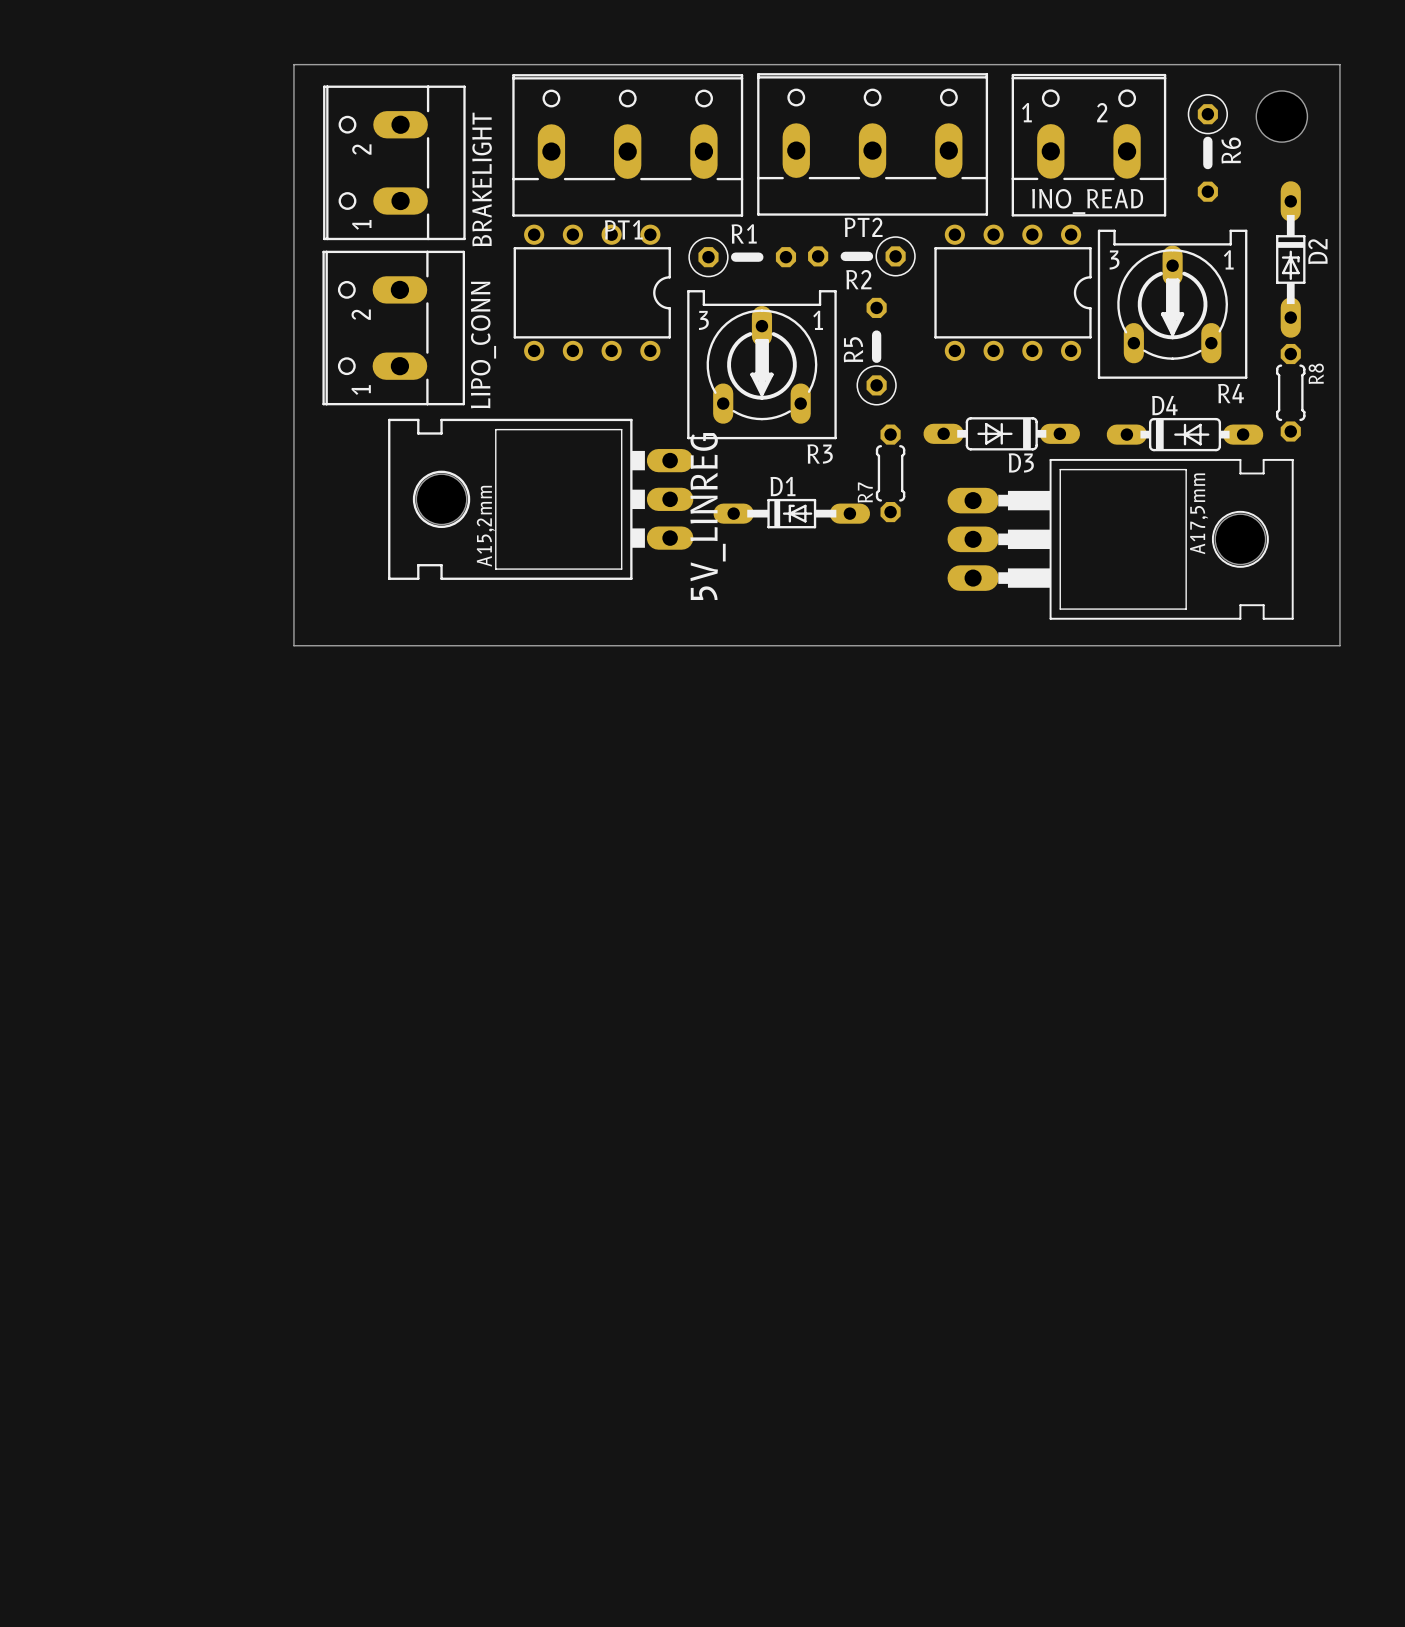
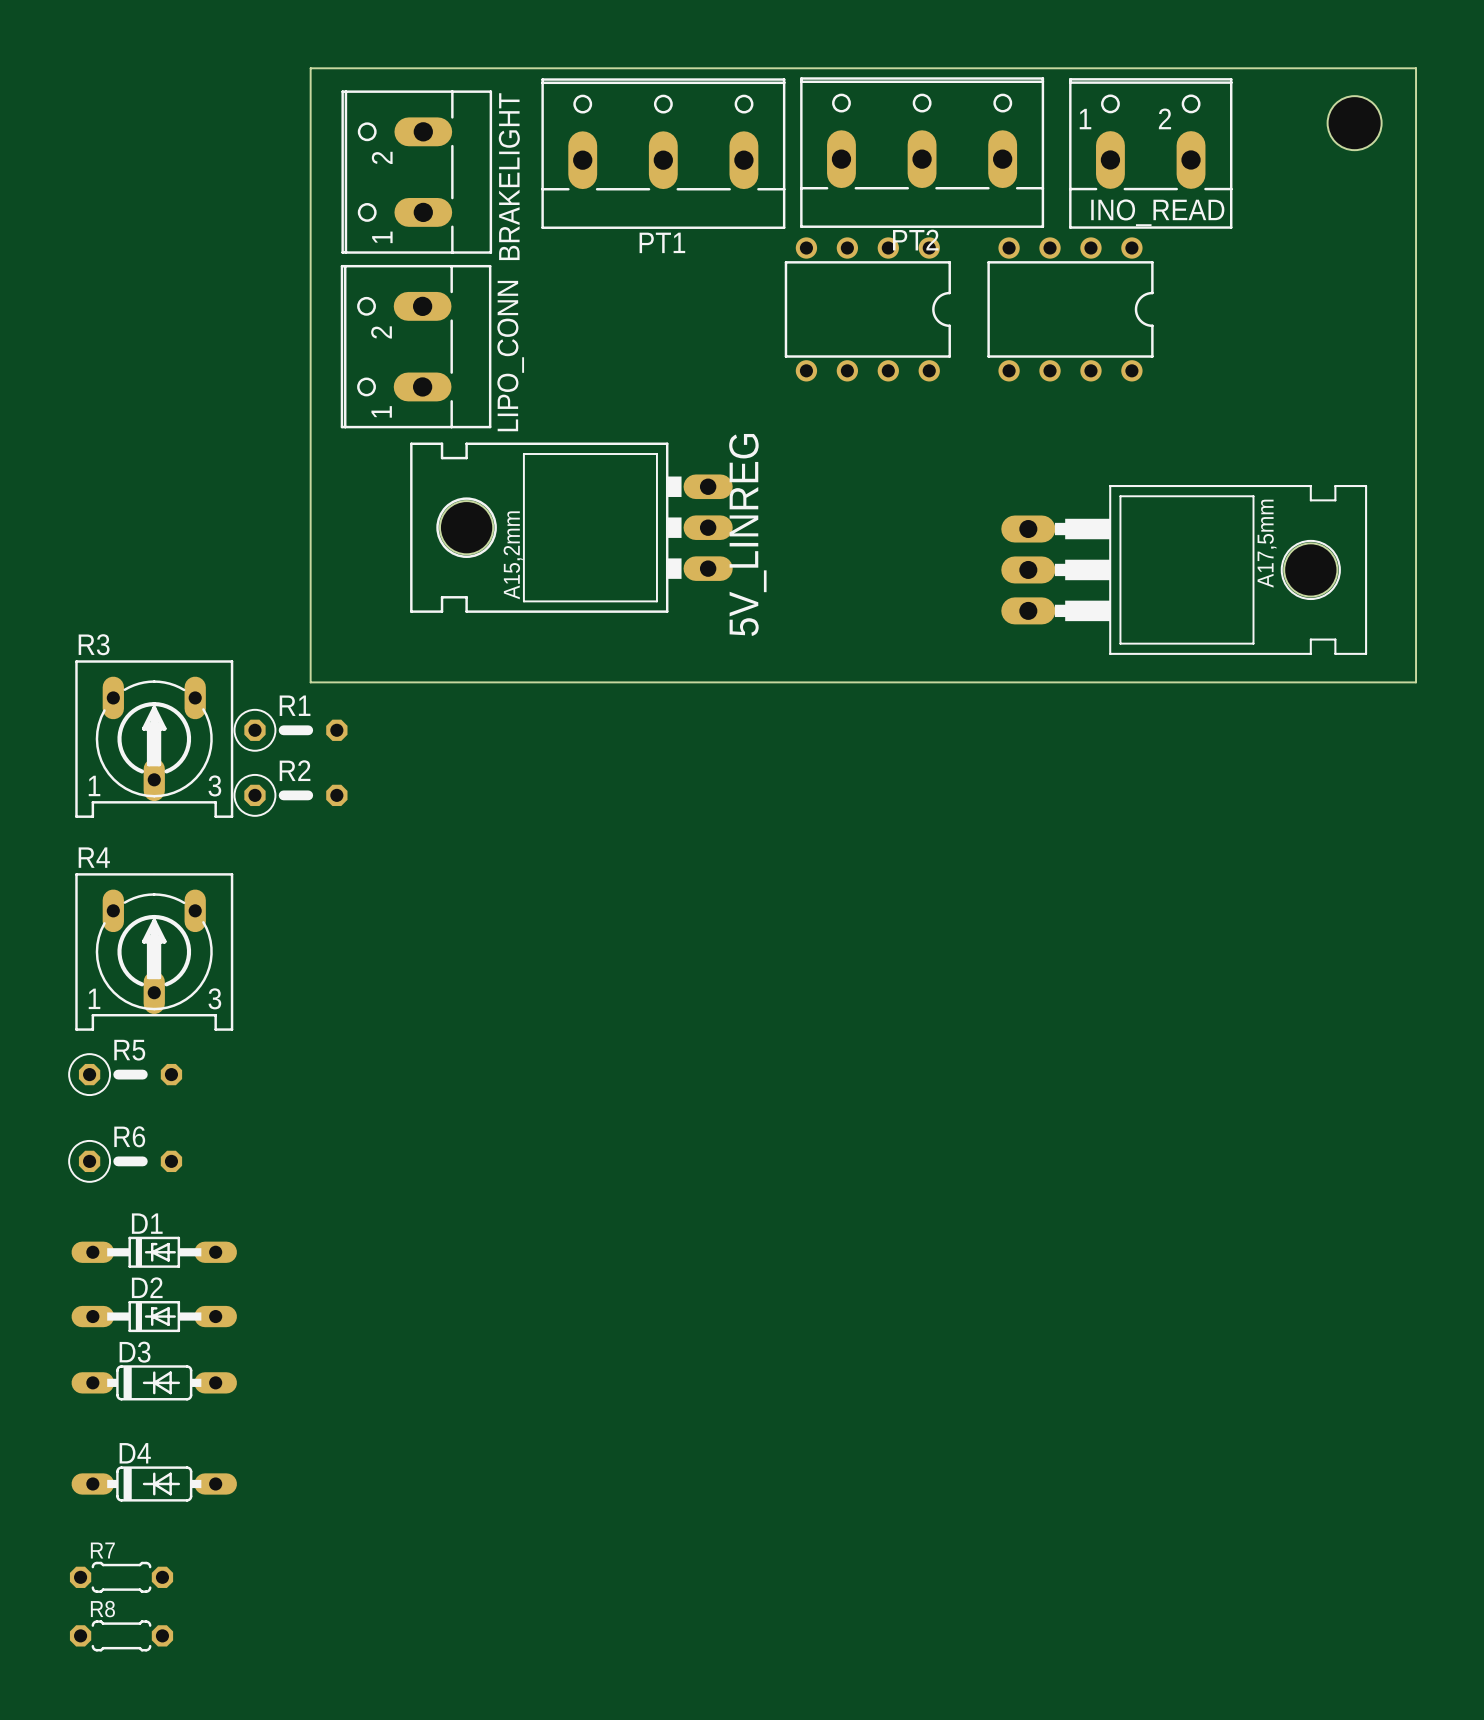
R6 rotation: 0° (1207, 147) -> 90° counterclockwise (125, 1161)
R6 position: (1207, 147) -> (125, 1161)
R4 footprint: [1097, 229, 1248, 379] -> [75, 873, 234, 1031]
R2 rotation: 0° (861, 256) -> 180° (290, 795)
R2 position: (861, 256) -> (290, 795)
R1 position: (742, 257) -> (290, 730)
D2 rotation: 0° (1290, 259) -> 90° counterclockwise (154, 1316)
D2 position: (1290, 259) -> (154, 1316)
R3 footprint: [687, 290, 837, 440] -> [75, 660, 234, 818]
part position: (592, 292) -> (867, 309)
R5 rotation: 0° (876, 351) -> 90° clockwise (125, 1074)
R5 position: (876, 351) -> (125, 1074)
R8 name position: R8 (1316, 373) -> R8 (102, 1609)
R8 rotation: 0° (1290, 392) -> 90° clockwise (121, 1635)
R8 position: (1290, 392) -> (121, 1635)
R4 name position: R4 (1231, 393) -> R4 (94, 857)
D3 rotation: 0° (1001, 433) -> 180° (154, 1382)
D3 position: (1001, 433) -> (154, 1382)
D4 position: (1185, 434) -> (154, 1483)
R3 name position: R3 (820, 454) -> R3 (94, 644)
R7 rotation: 0° (890, 473) -> 90° clockwise (121, 1577)
R7 position: (890, 473) -> (121, 1577)
D1 position: (791, 513) -> (154, 1252)

